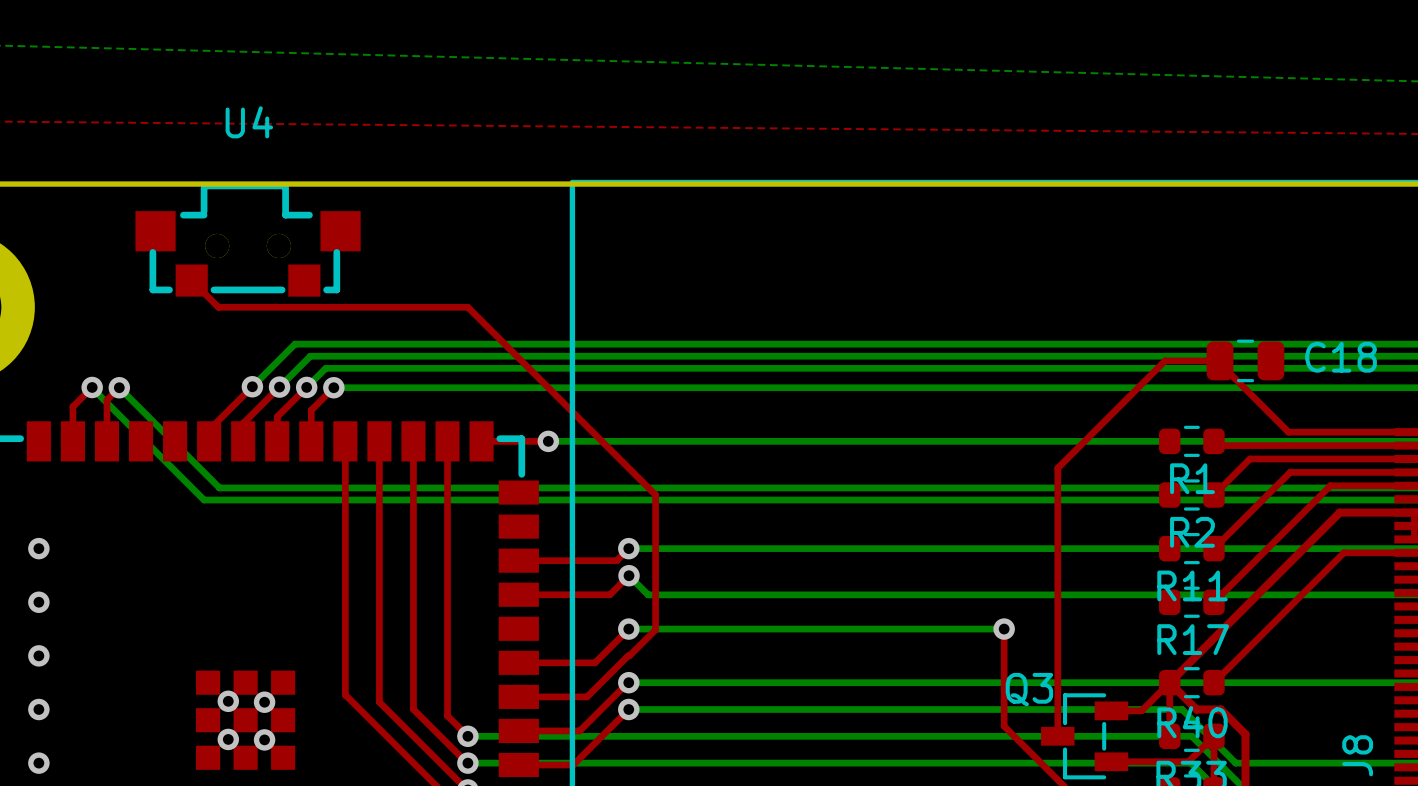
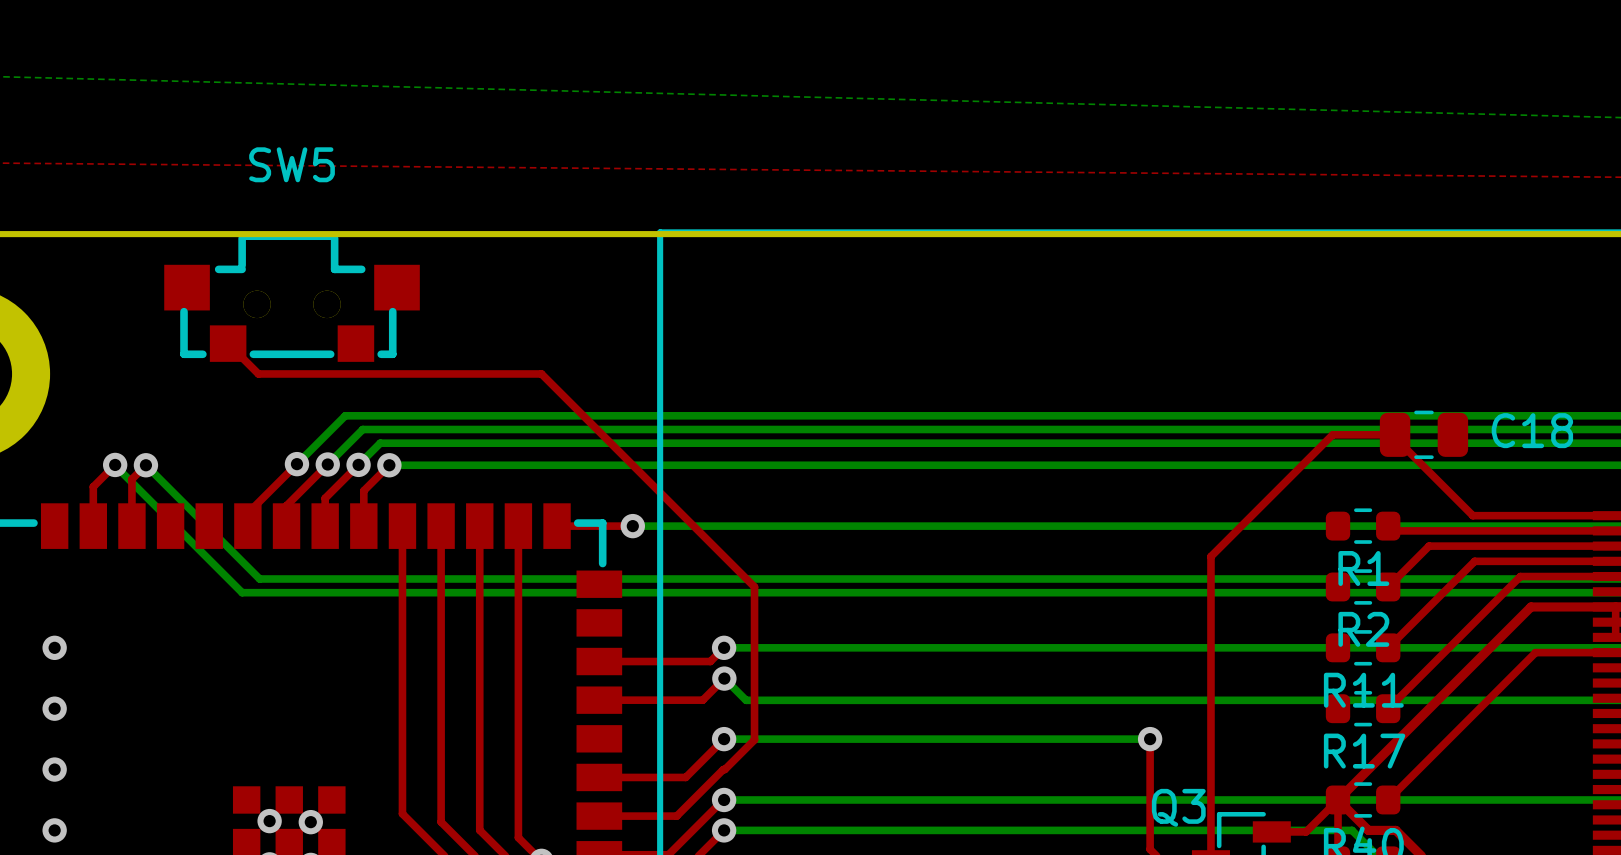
U4 name: U4 (249, 122) -> SW5 (292, 164)

